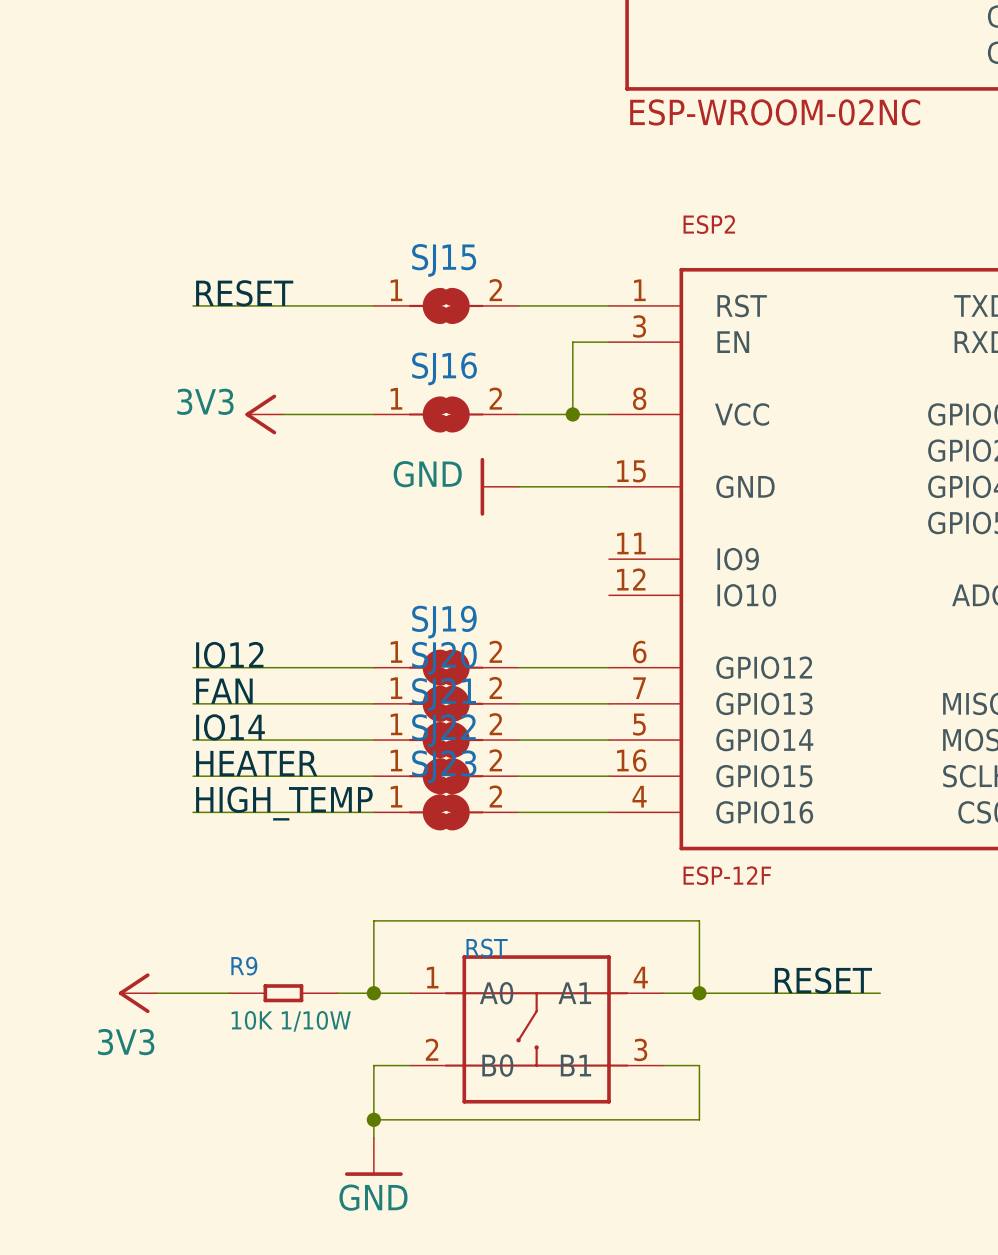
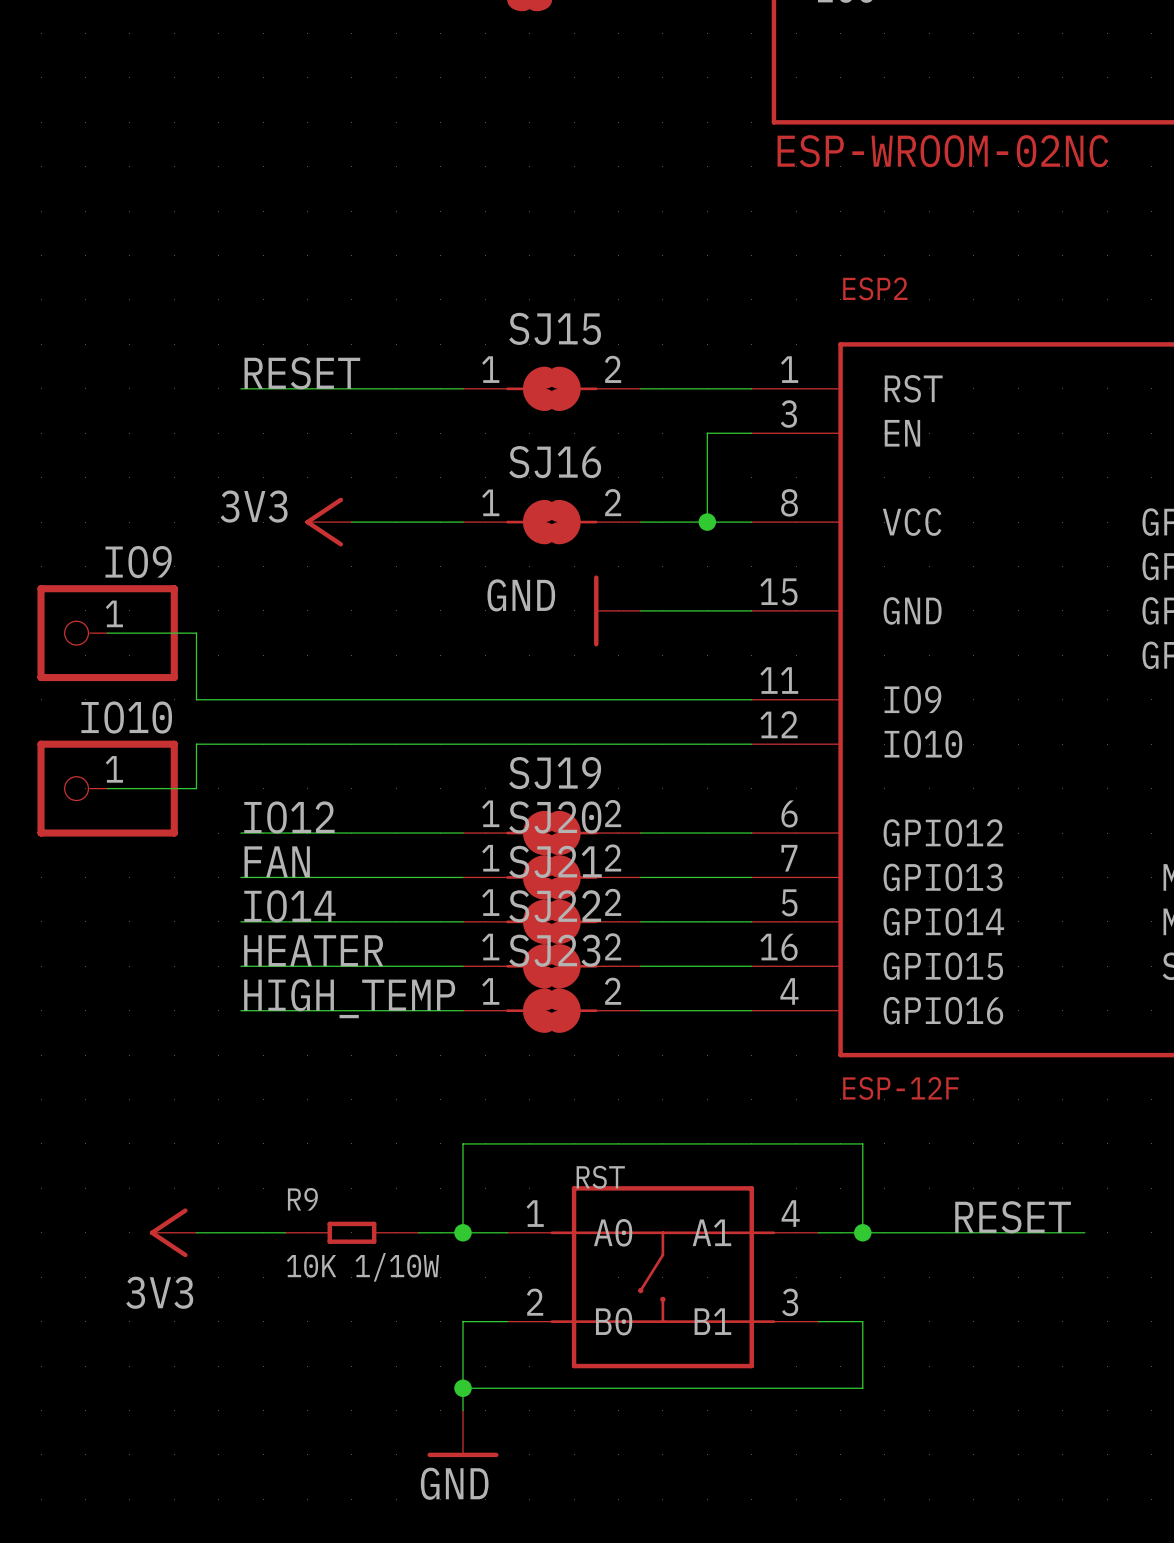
wire: none -> (107, 633) (196, 633) (196, 699) (751, 699)
IO9: none -> (107, 633)
wire: none -> (751, 744) (196, 744) (196, 788) (107, 788)
IO10: none -> (107, 788)

